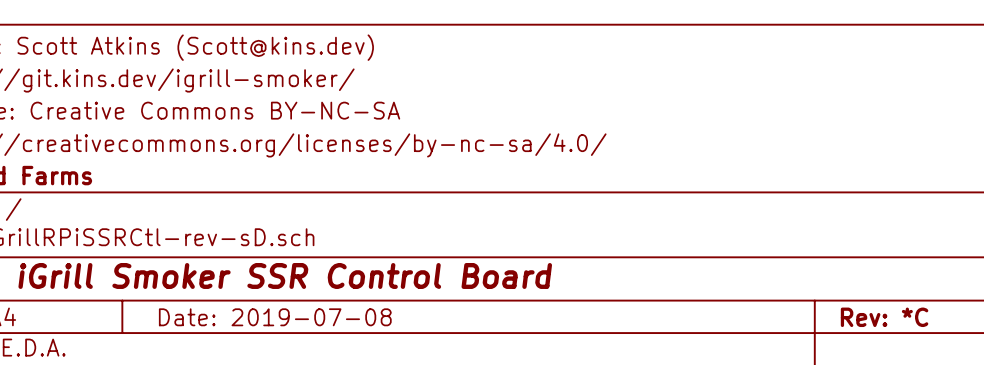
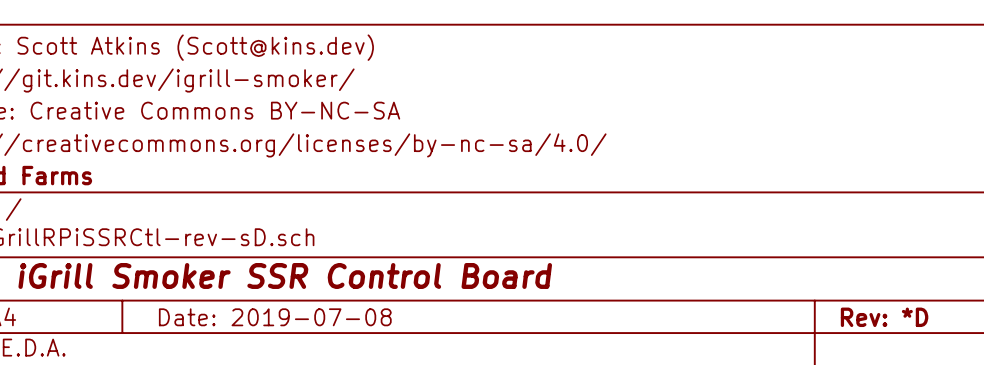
title block: Rev: *C (884, 317) -> Rev: *D (884, 317)

